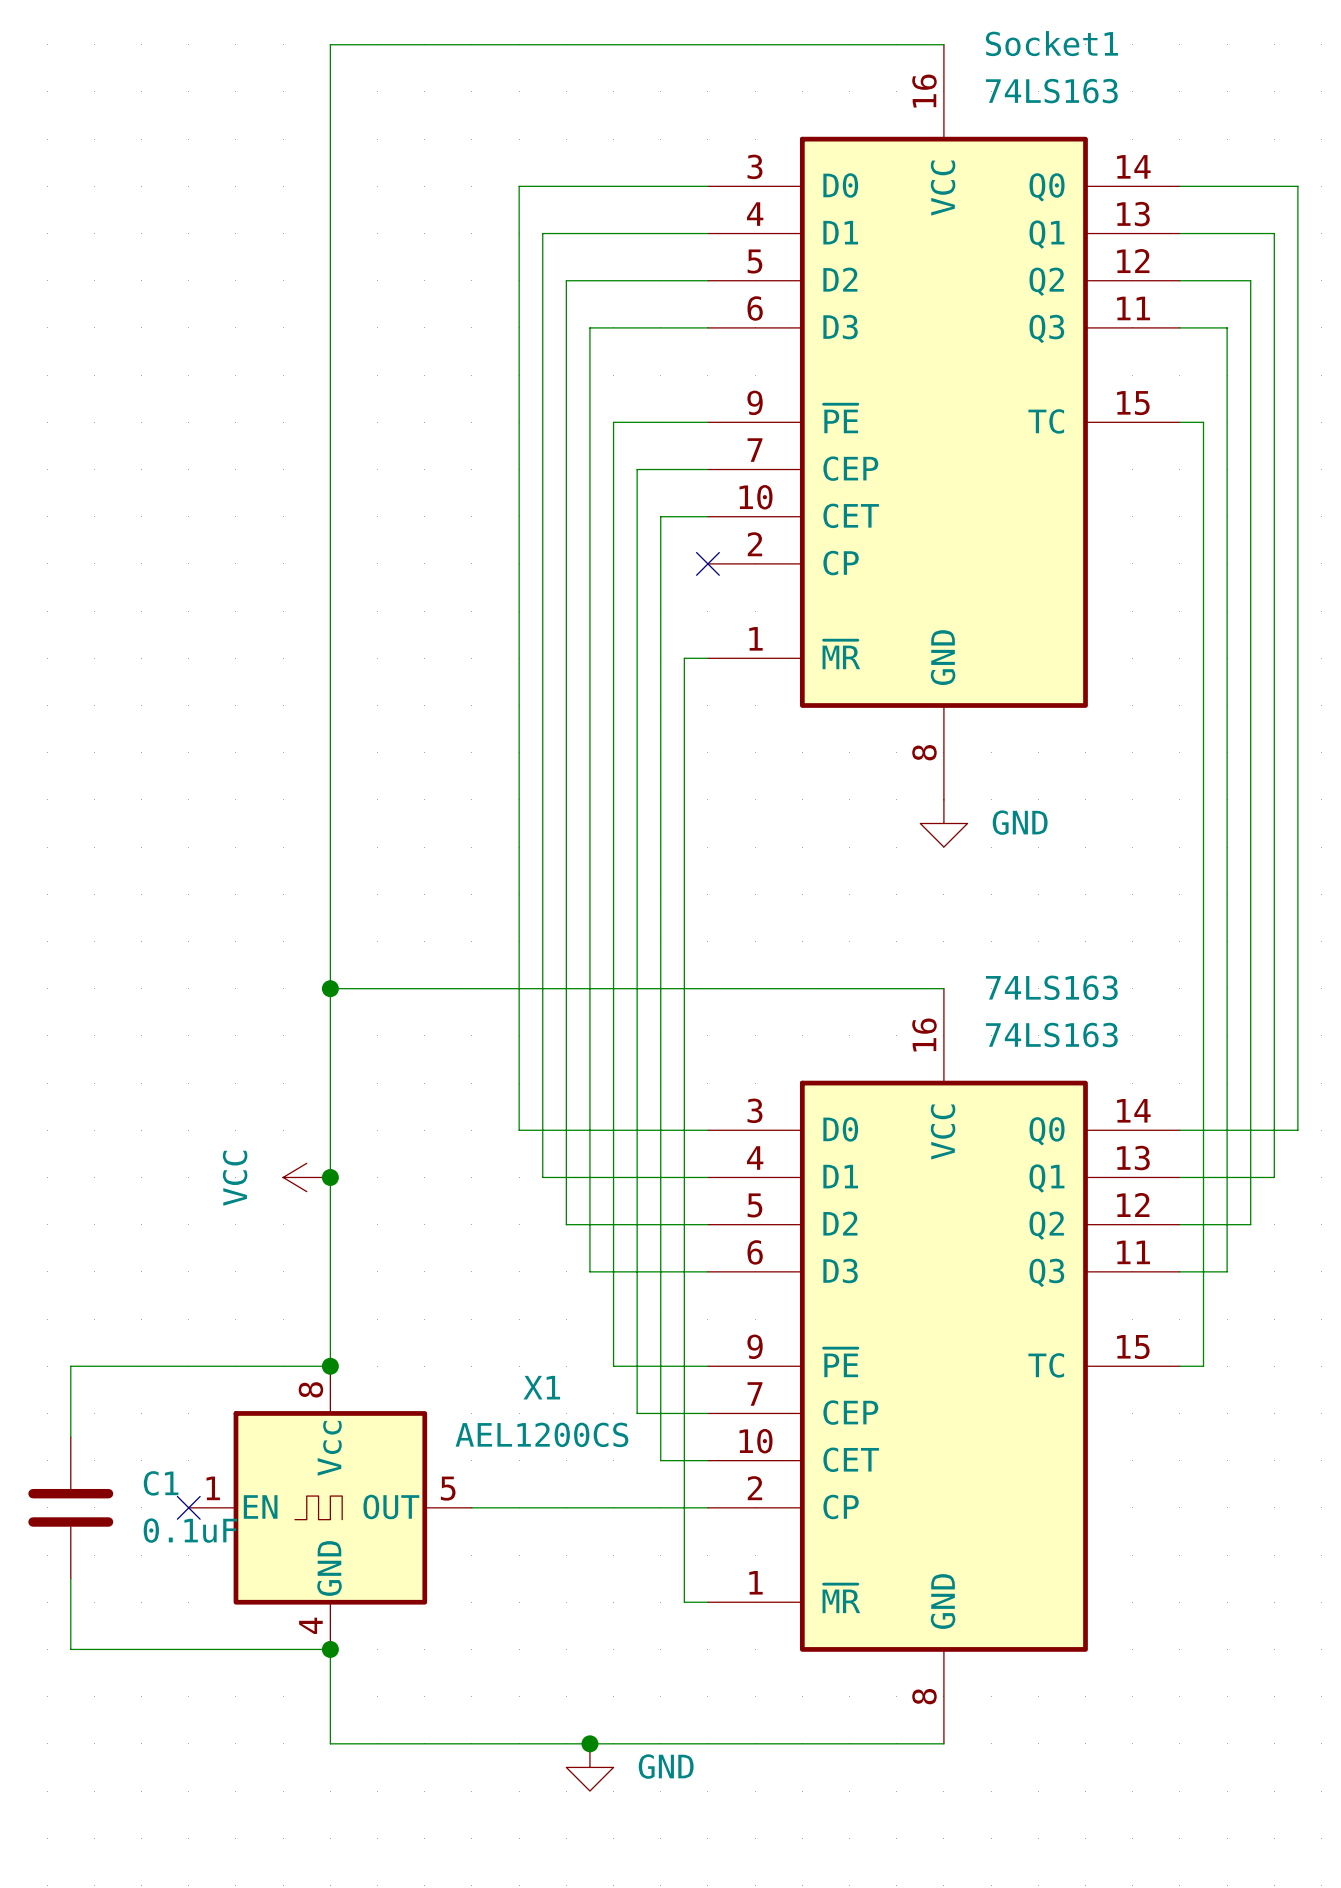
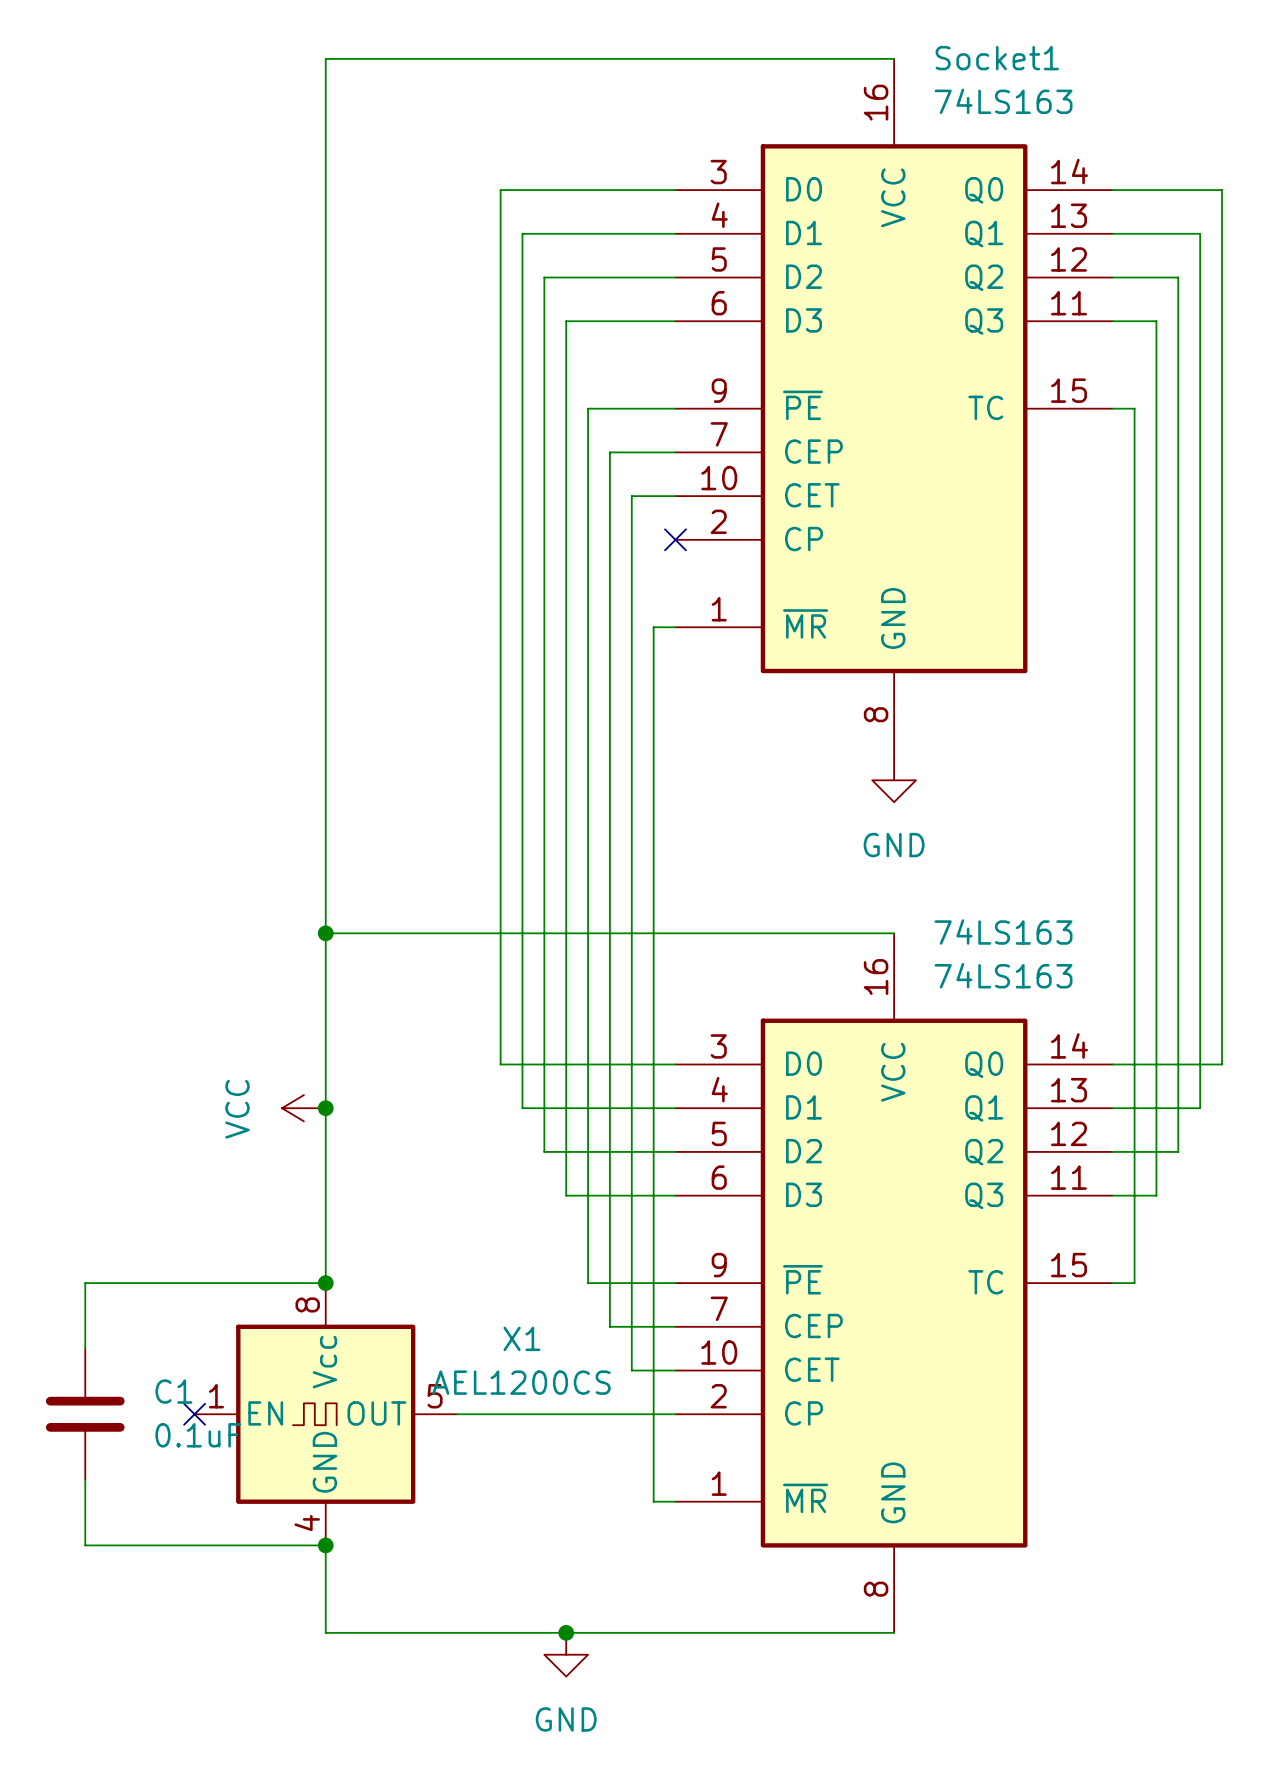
power symbol text position: GND (1020, 822) -> GND (894, 845)
X1 name position: X1 (541, 1387) -> X1 (521, 1338)
X1 value position: AEL1200CS (541, 1434) -> AEL1200CS (521, 1382)
power symbol text position: GND (666, 1766) -> GND (566, 1719)

